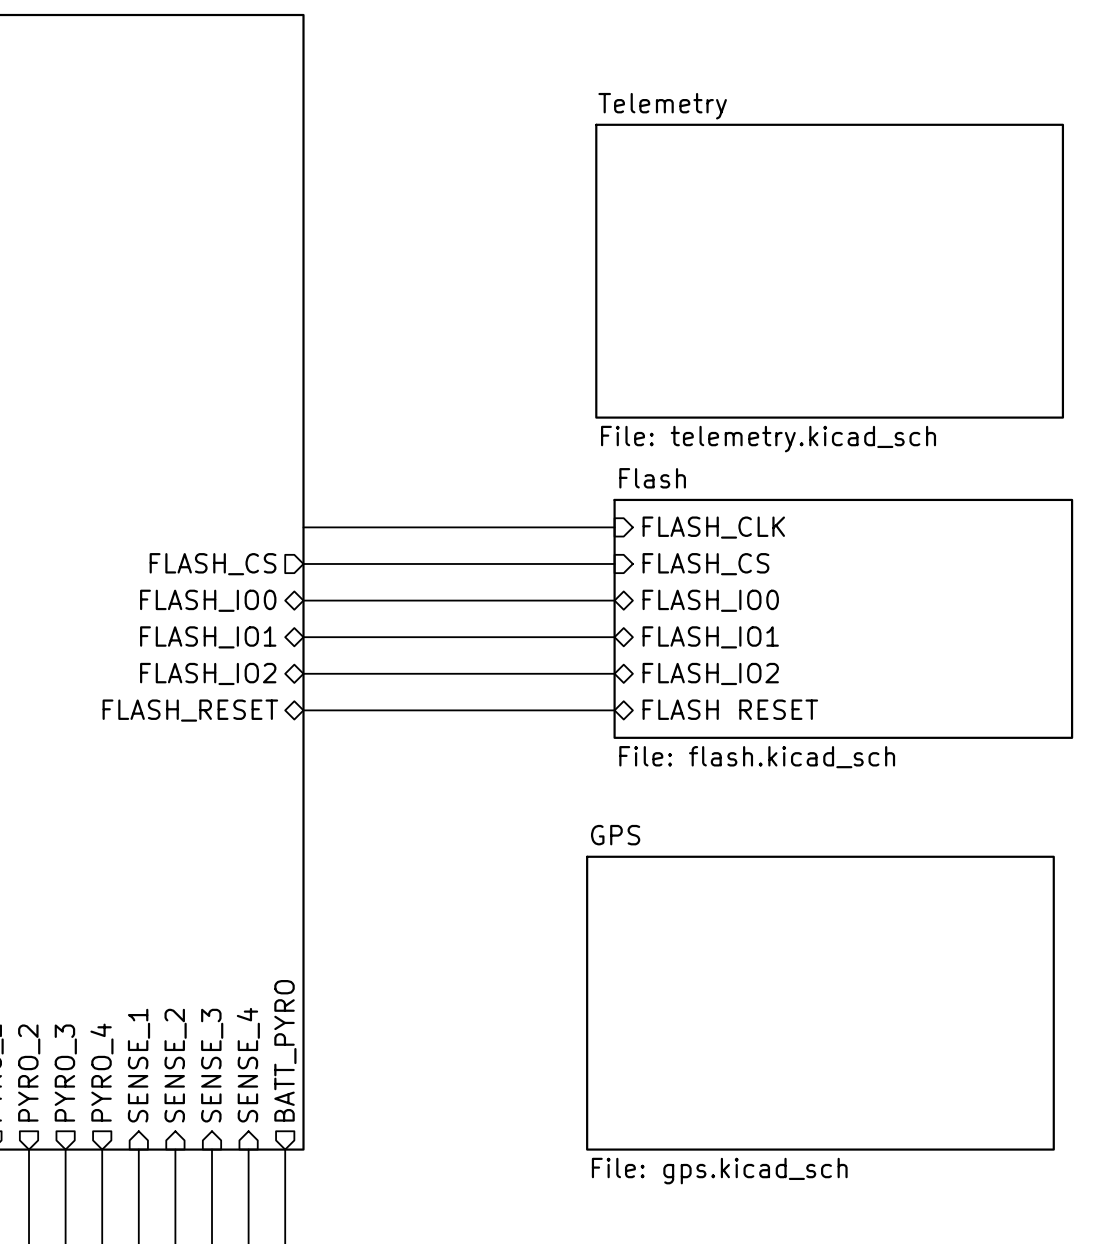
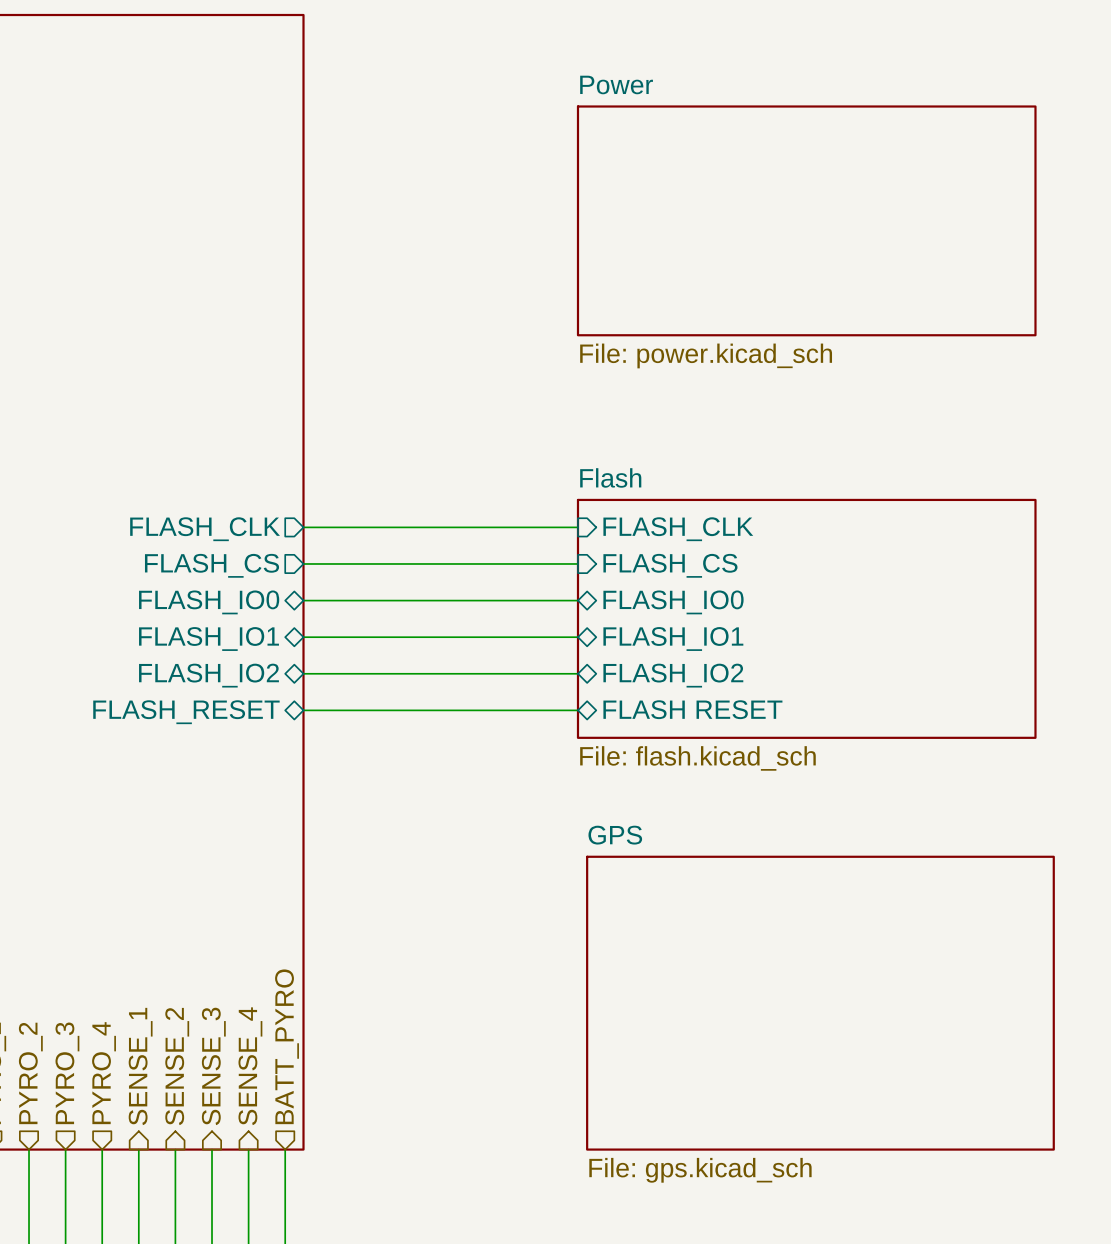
sheet Power: none -> File: power.kicad_sch (806, 220)
sheet Telemetry: File: telemetry.kicad_sch (829, 271) -> none
sheet pin: none -> FLASH_CLK (205, 529)
wire: (577, 527) (614, 527) -> none
sheet pin position: FLASH_CLK (713, 527) -> FLASH_CLK (678, 529)
wire: (577, 563) (614, 563) -> none
sheet pin position: FLASH_CS (705, 564) -> FLASH_CS (670, 565)
wire: (577, 600) (614, 600) -> none
sheet pin position: FLASH_IO0 (710, 600) -> FLASH_IO0 (673, 602)
sheet Flash position: (843, 618) -> (806, 618)
wire: (577, 637) (614, 637) -> none
sheet pin position: FLASH_IO1 (710, 637) -> FLASH_IO1 (673, 639)
wire: (577, 673) (614, 673) -> none
sheet pin position: FLASH_IO2 (710, 673) -> FLASH_IO2 (673, 675)
sheet pin position: FLASH RESET (730, 709) -> FLASH RESET (692, 709)
wire: (577, 710) (614, 710) -> none

